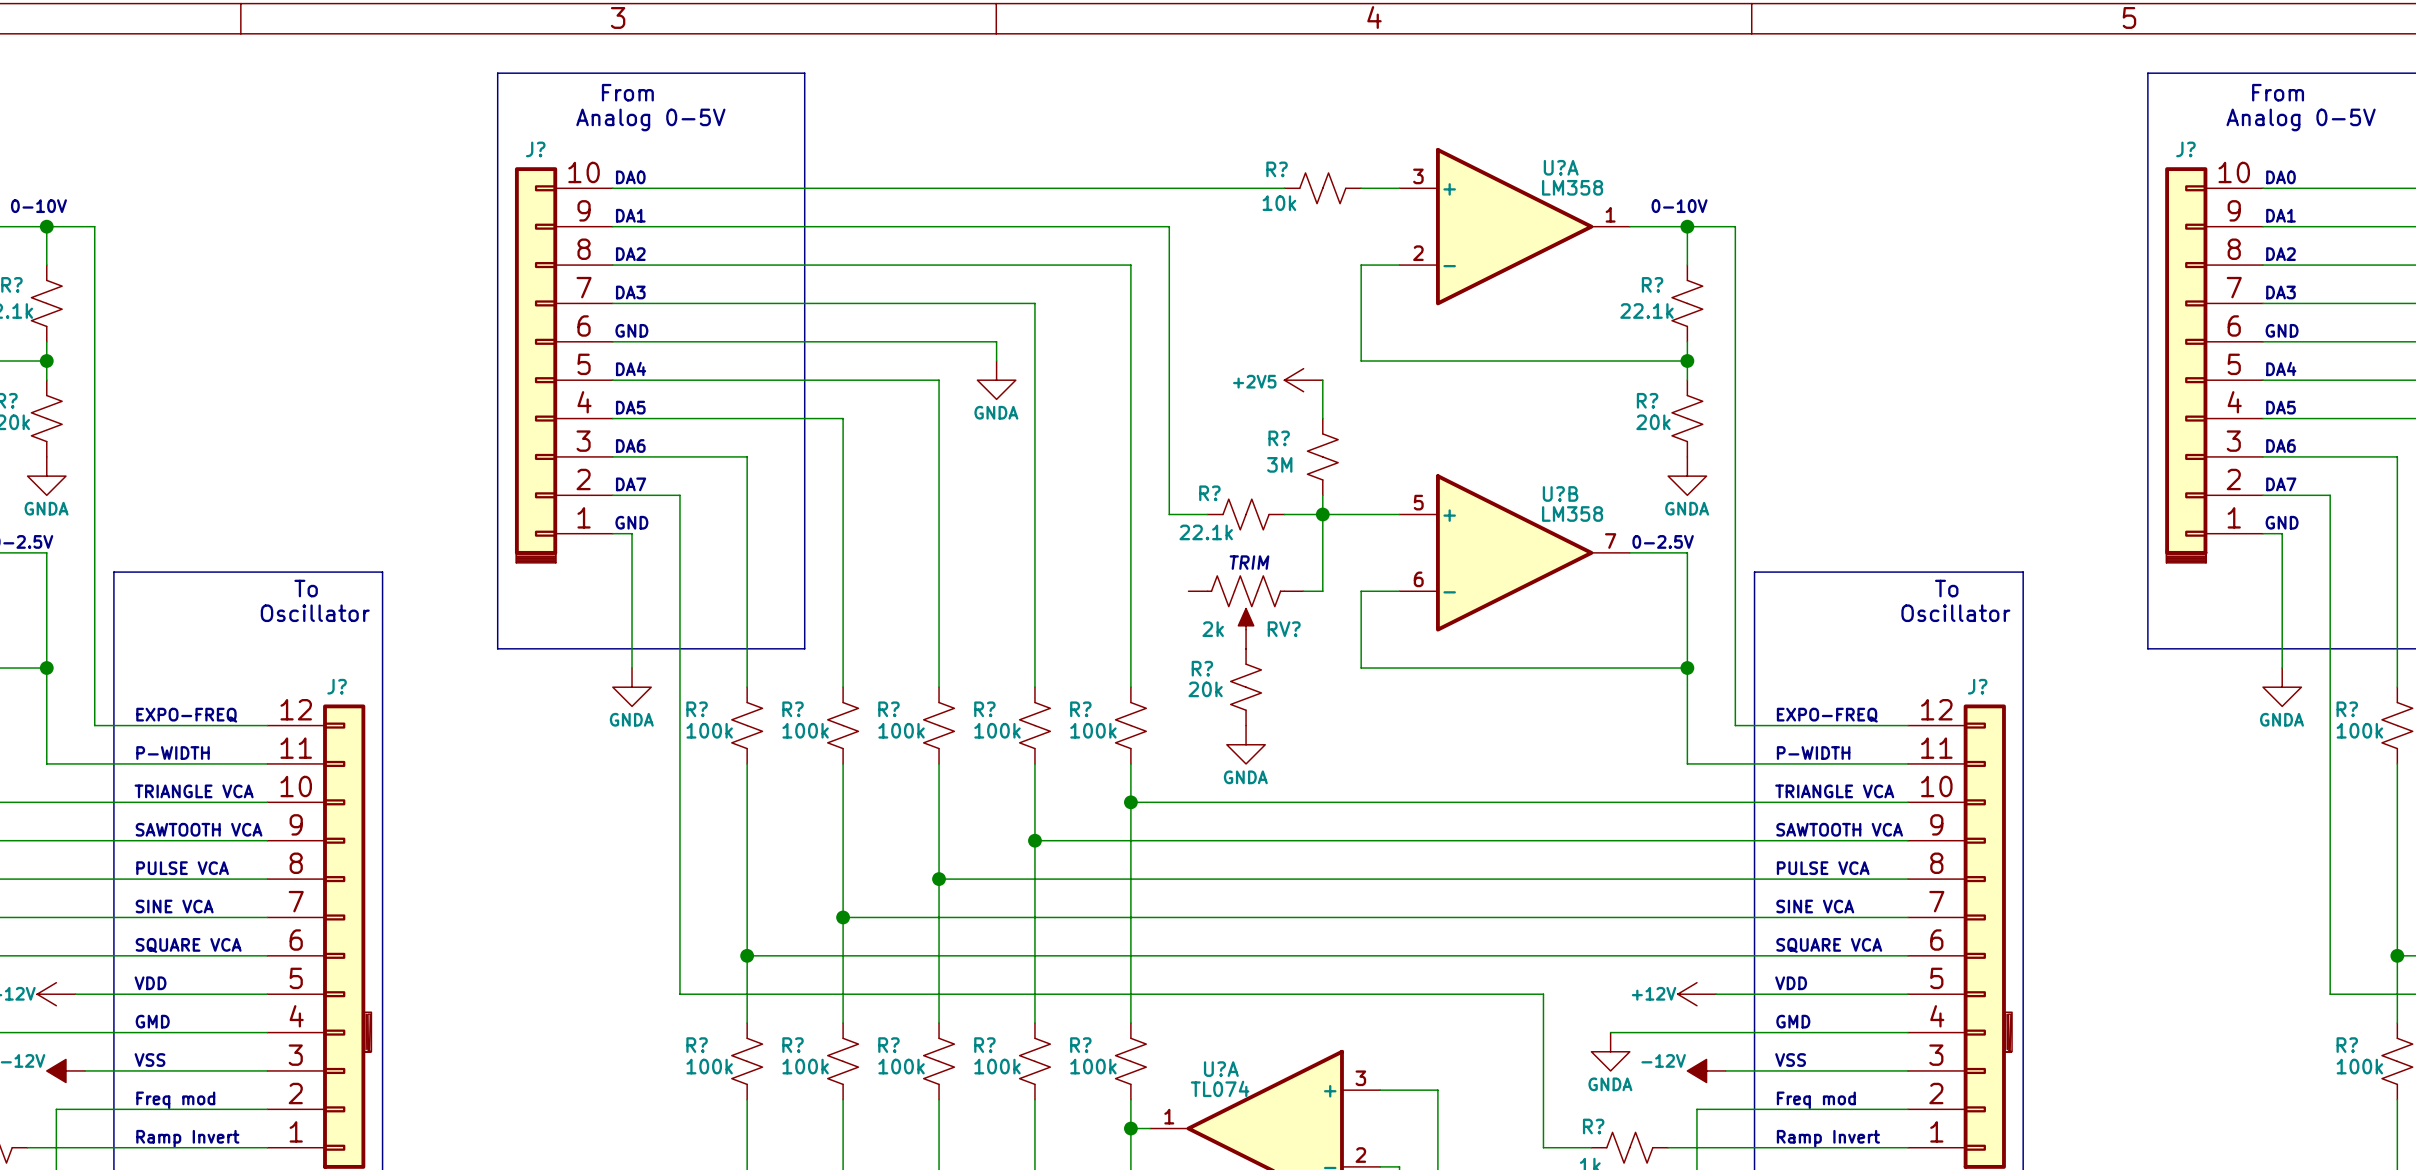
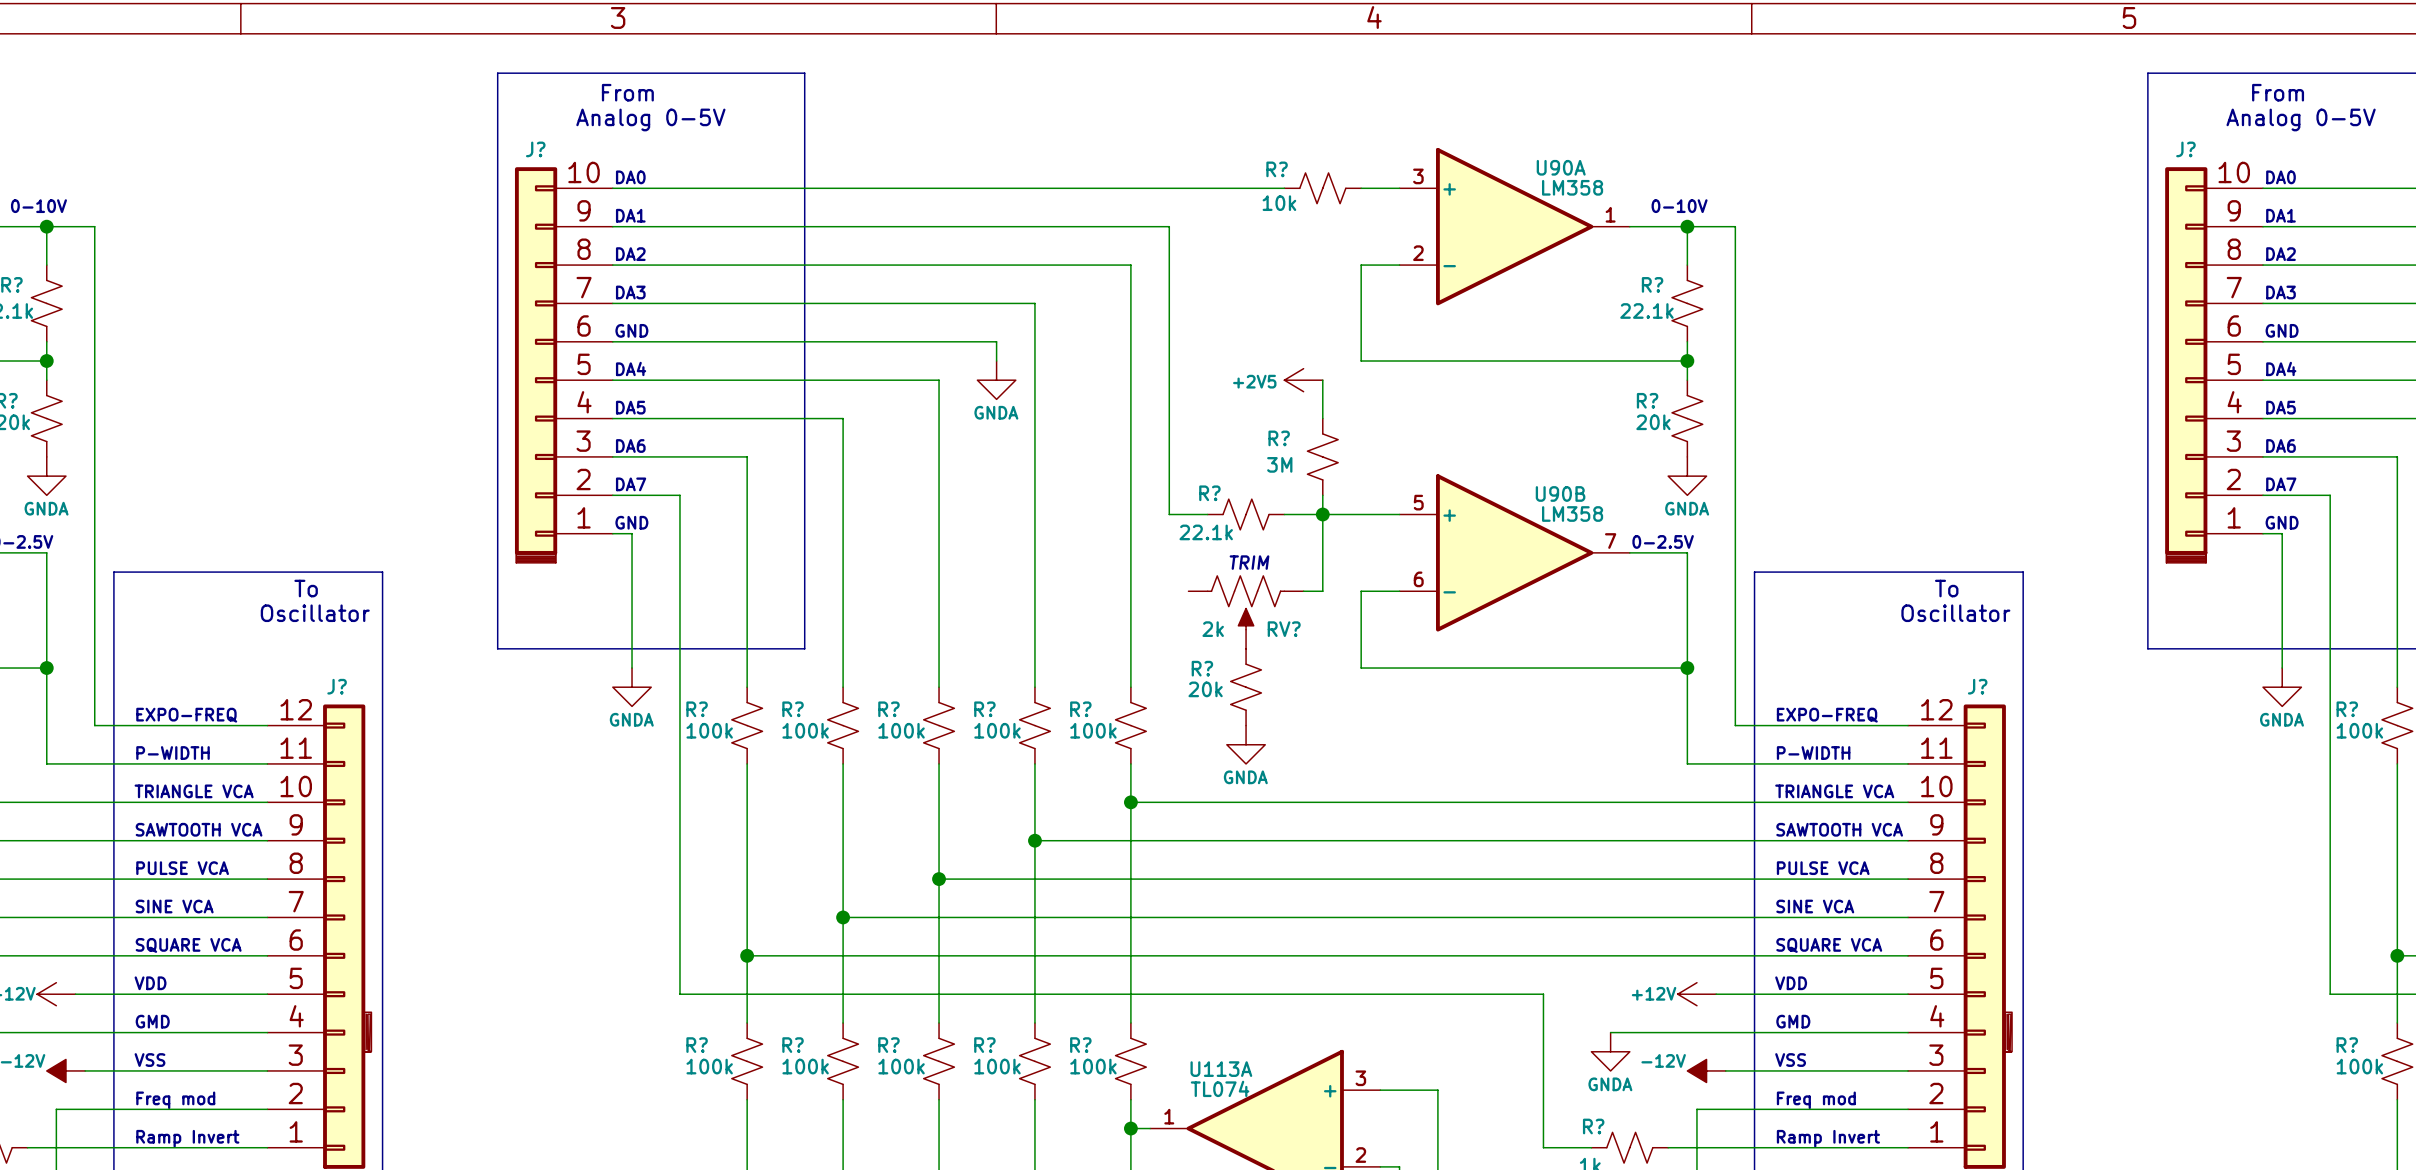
U?A name: U?A (1561, 167) -> U90A (1561, 167)
U?B name: U?B (1560, 493) -> U90B (1560, 493)
U?A name: U?A (1221, 1069) -> U113A (1221, 1069)

